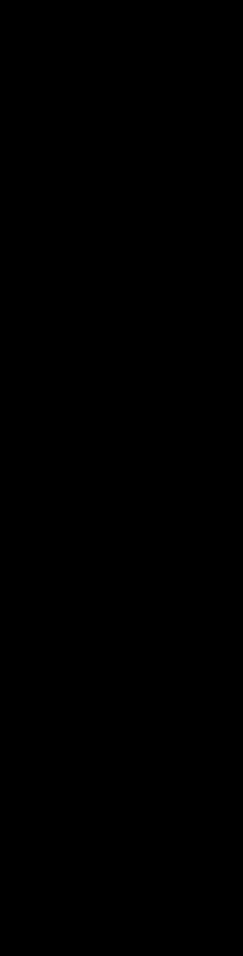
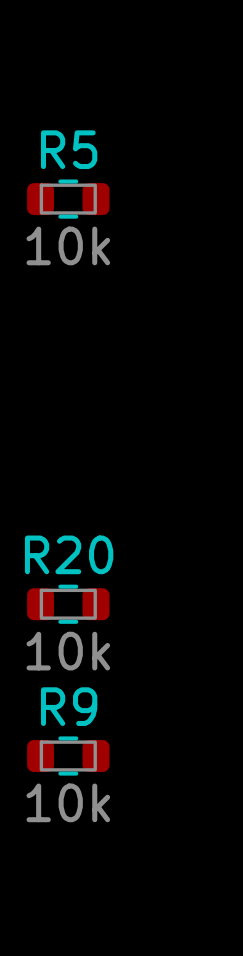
R5: none -> 10k (68, 199)
R20: none -> 10k (68, 604)
R9: none -> 10k (68, 756)

